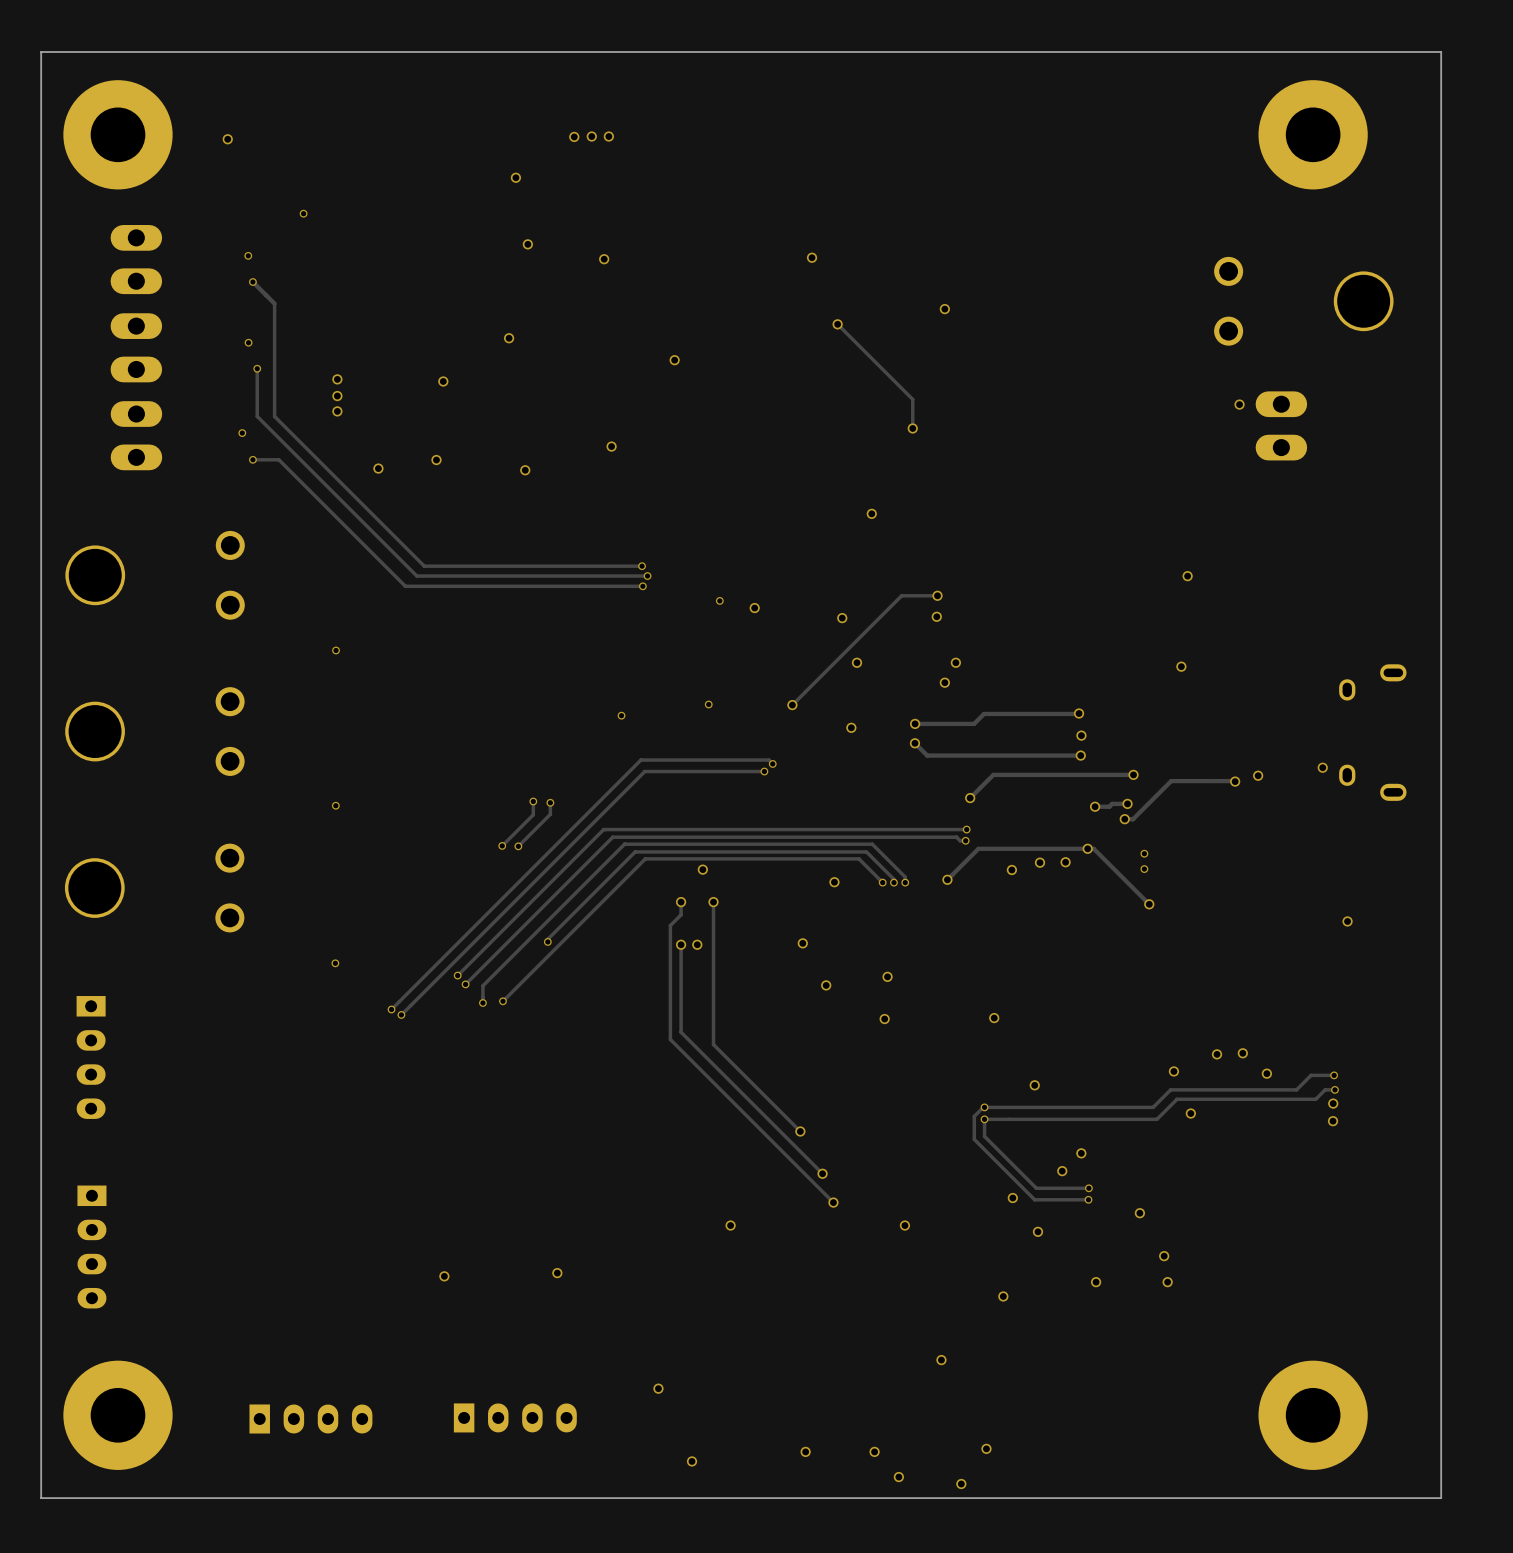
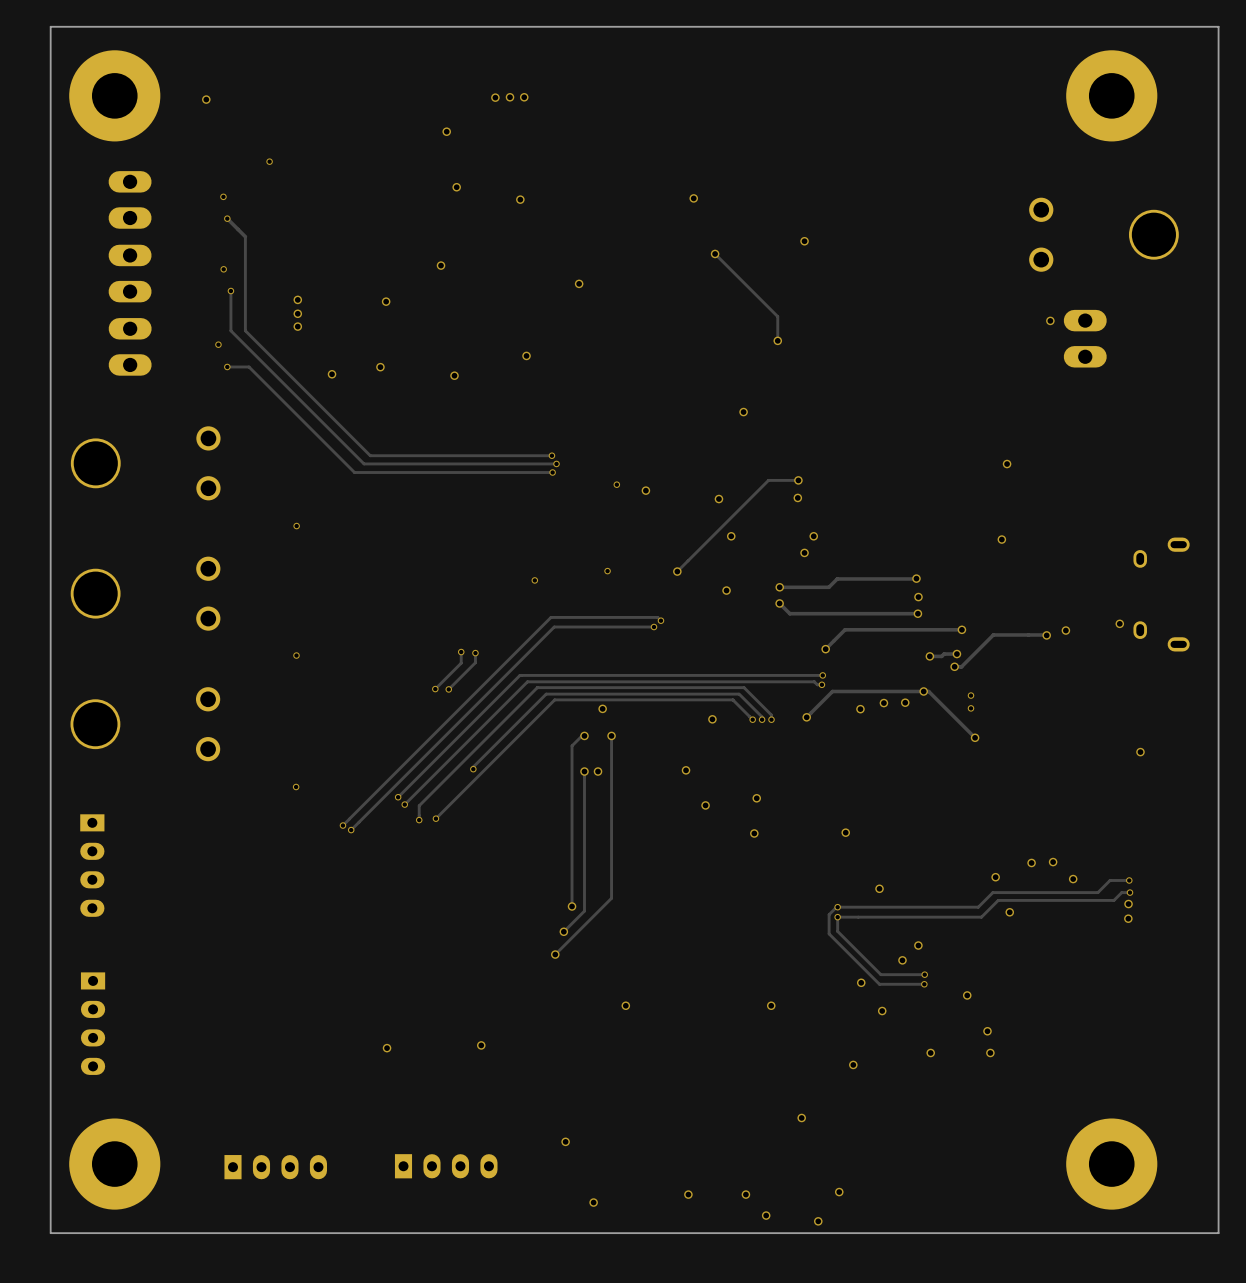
track: (681, 902) (681, 914) (670, 925) (670, 1039) (833, 1202) -> (584, 736) (581, 736) (572, 745) (572, 906)
track: (681, 1032) (822, 1173) -> (584, 844) (584, 911) (563, 931)
track: (713, 1044) (801, 1132) -> (611, 854) (611, 898) (555, 954)
via: none -> (572, 906)
via: (800, 1131) -> none
via: none -> (563, 931)
via: none -> (555, 954)
via: (822, 1173) -> none
via: (833, 1202) -> none

